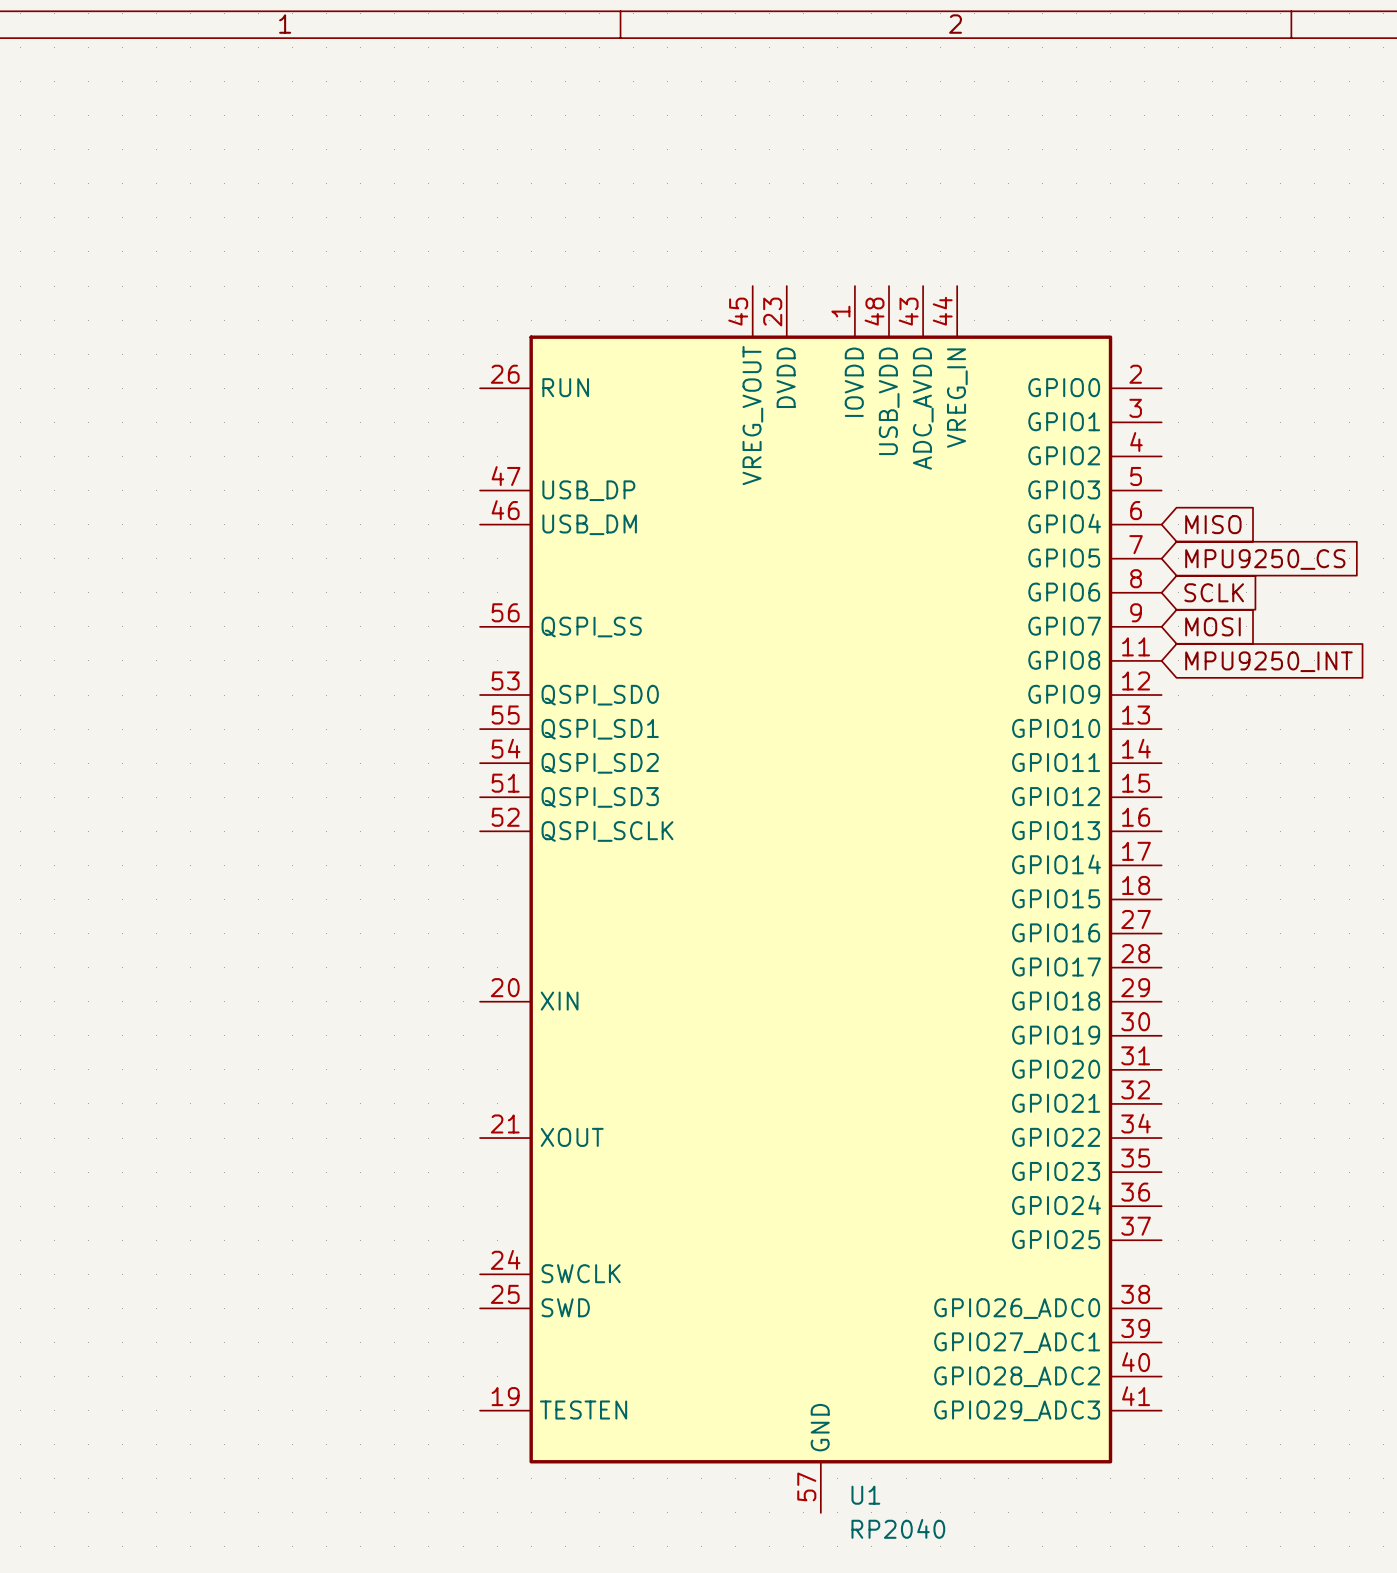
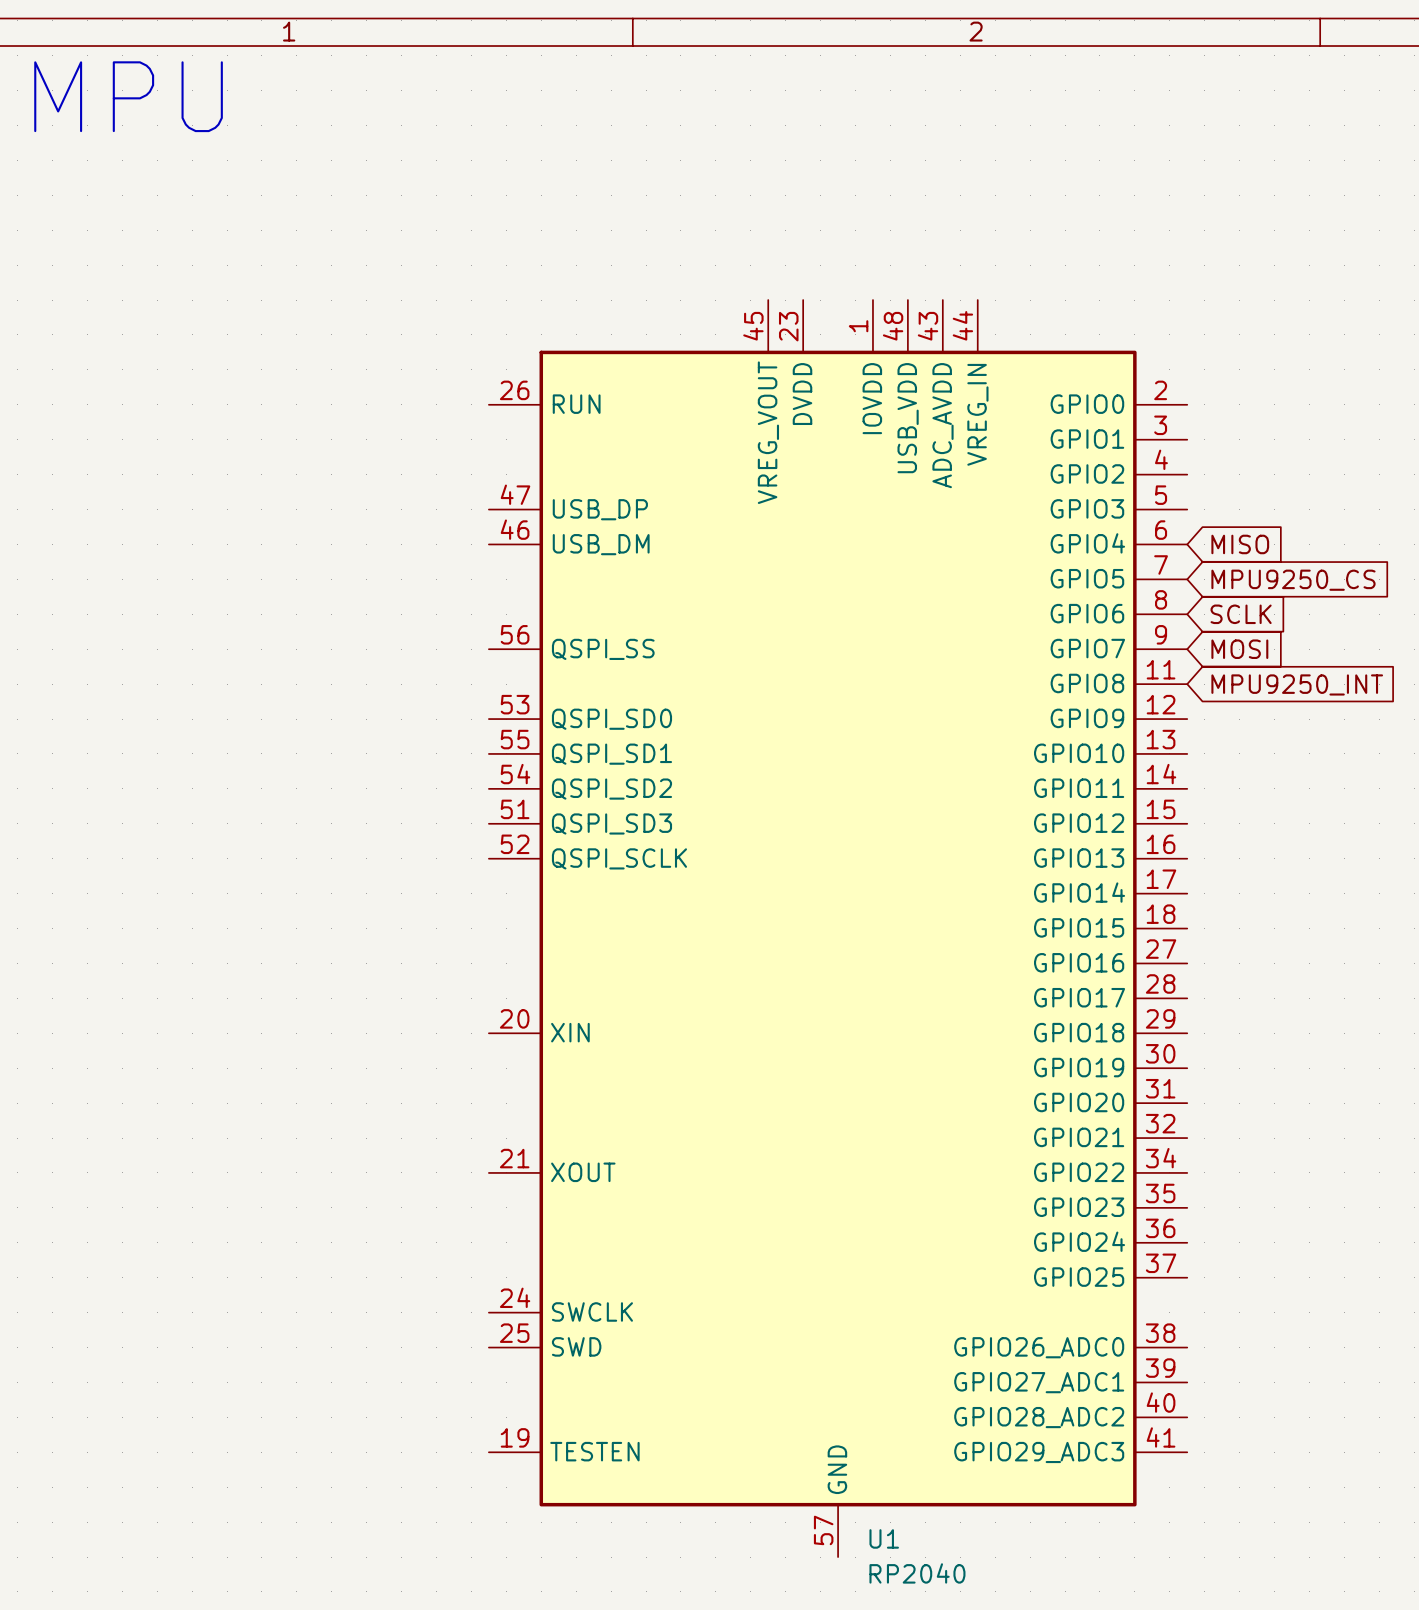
text: none -> MPU (128, 96)

